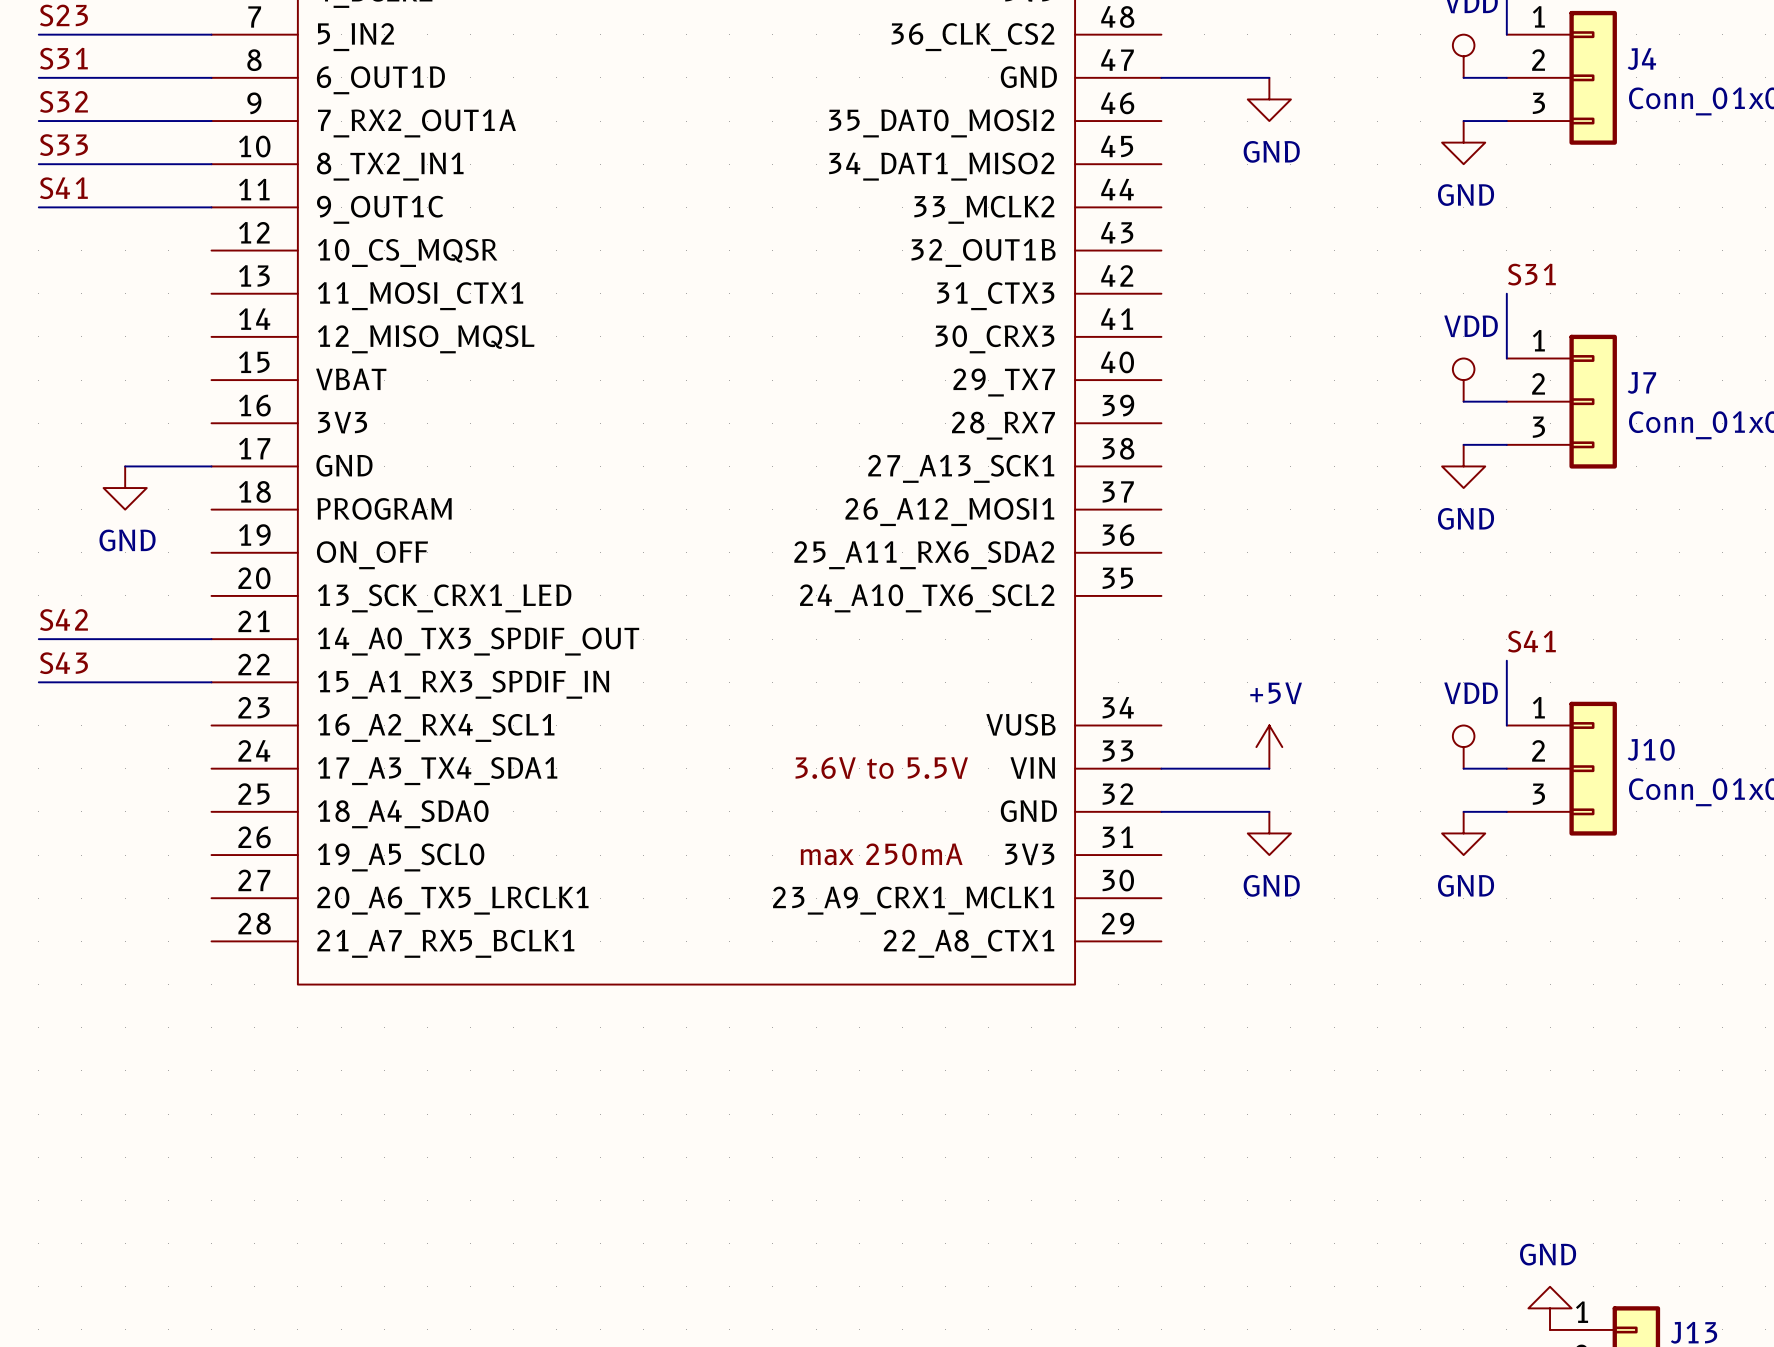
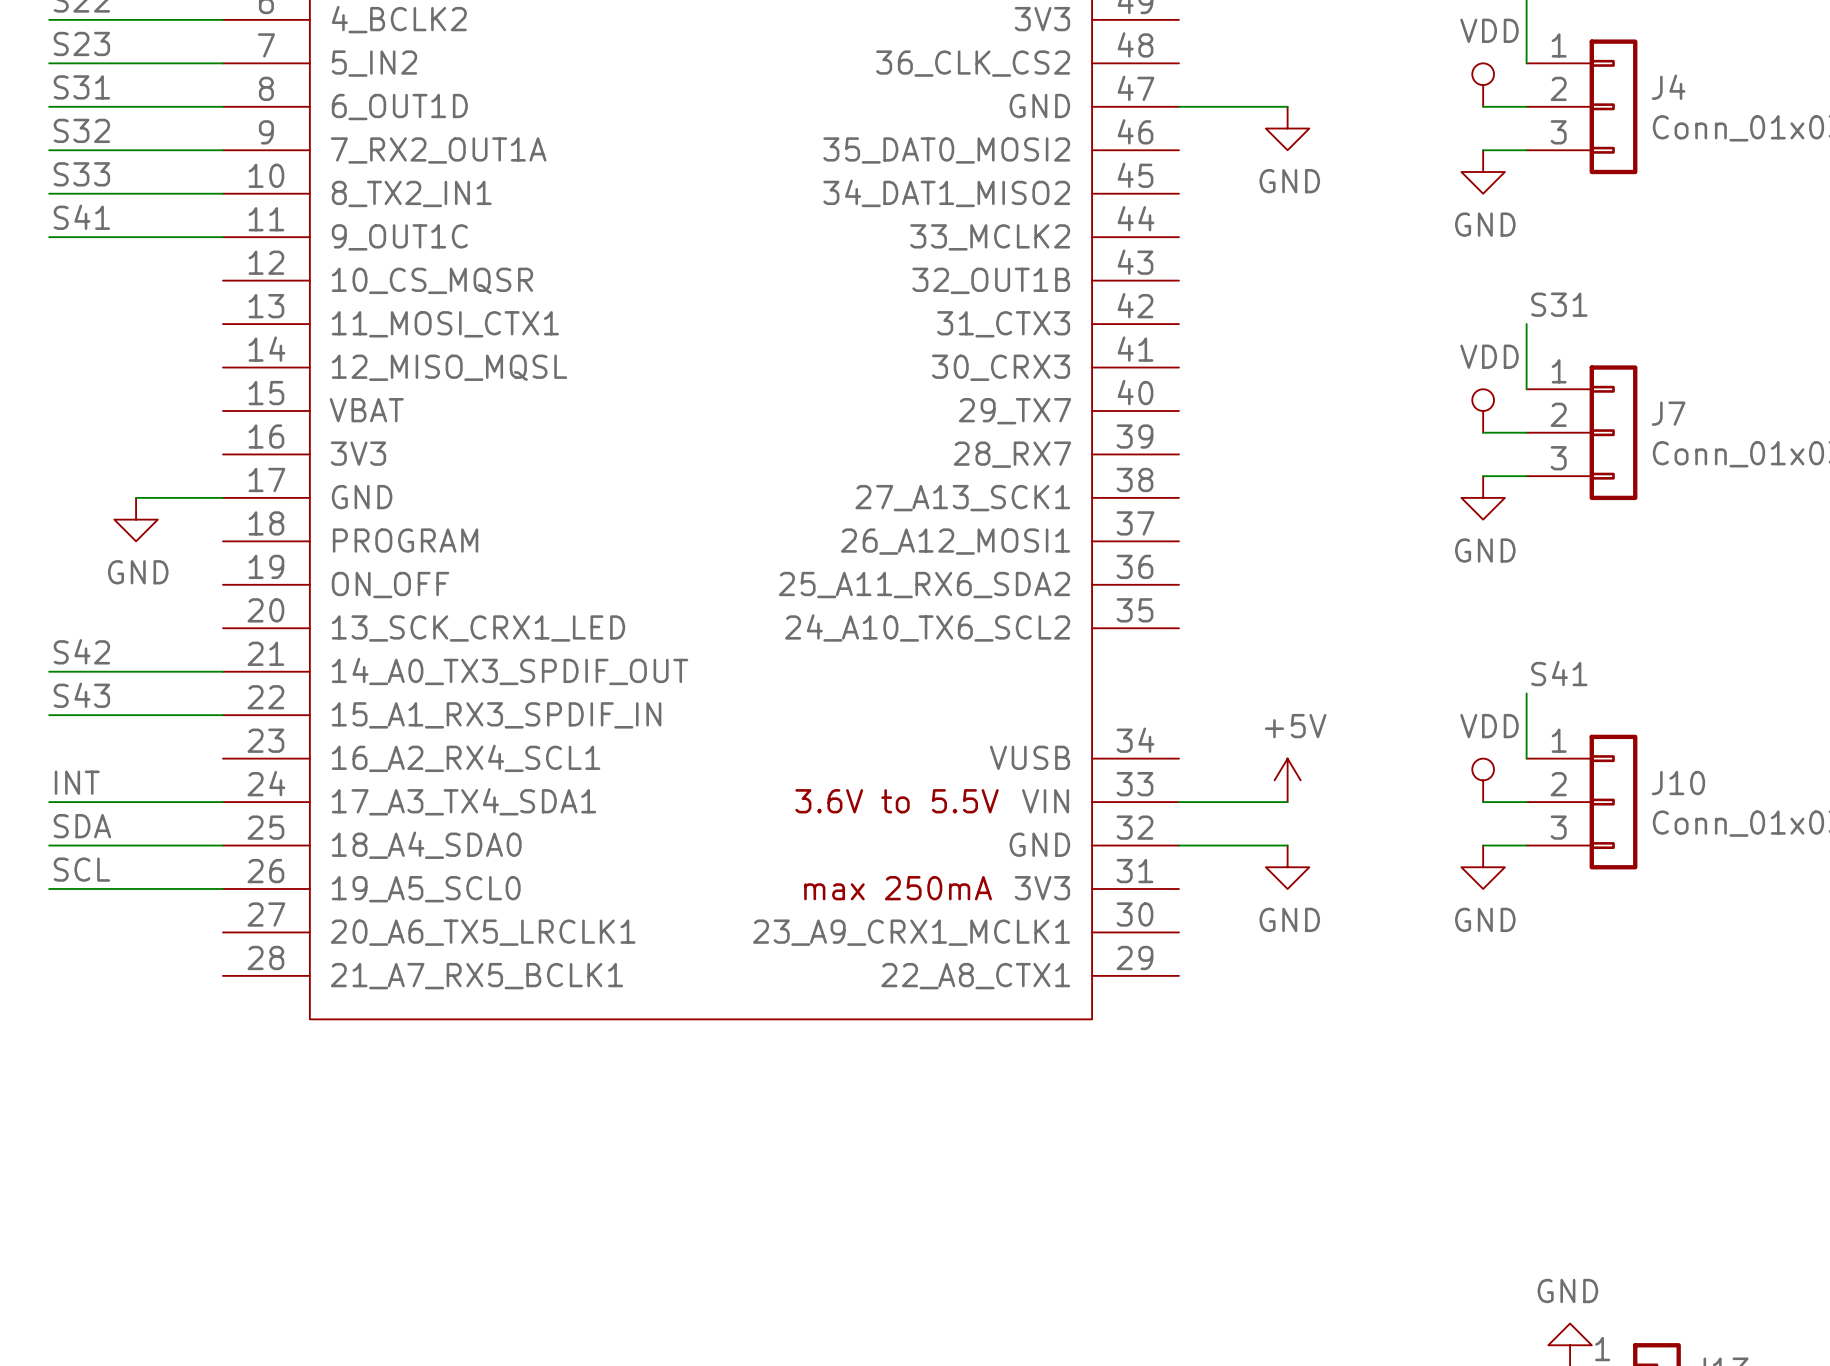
label: none -> INT (77, 782)
wire: none -> (49, 802) (222, 802)
label: none -> SDA (82, 826)
wire: none -> (49, 845) (222, 845)
label: none -> SCL (81, 869)
wire: none -> (49, 888) (222, 888)

